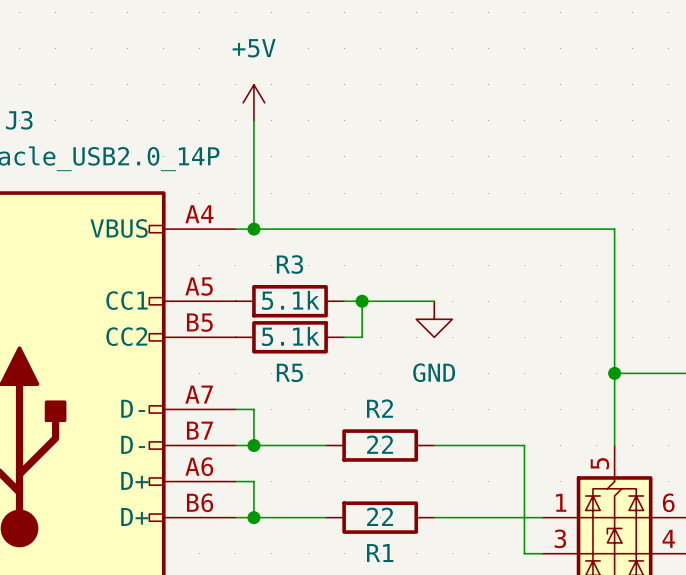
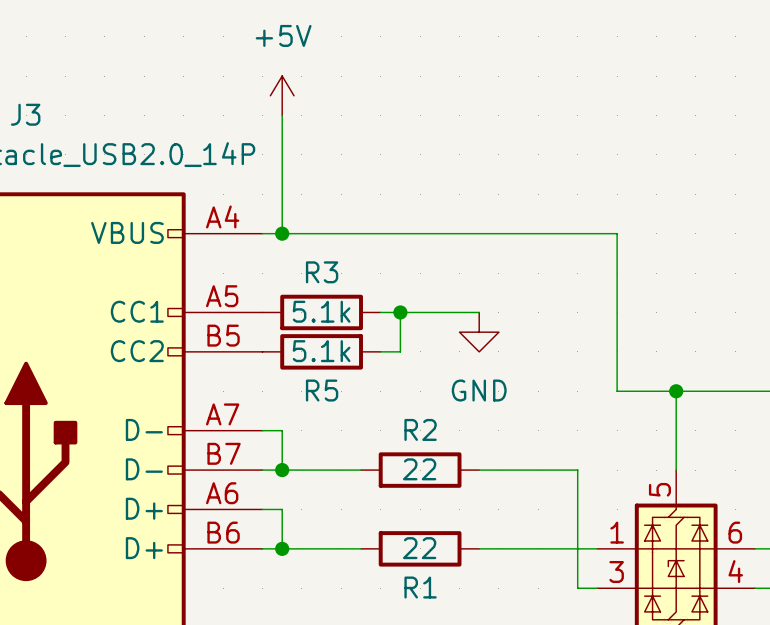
wire: (560, 229) (614, 229) (614, 373) -> (617, 233) (617, 391) (676, 391)

